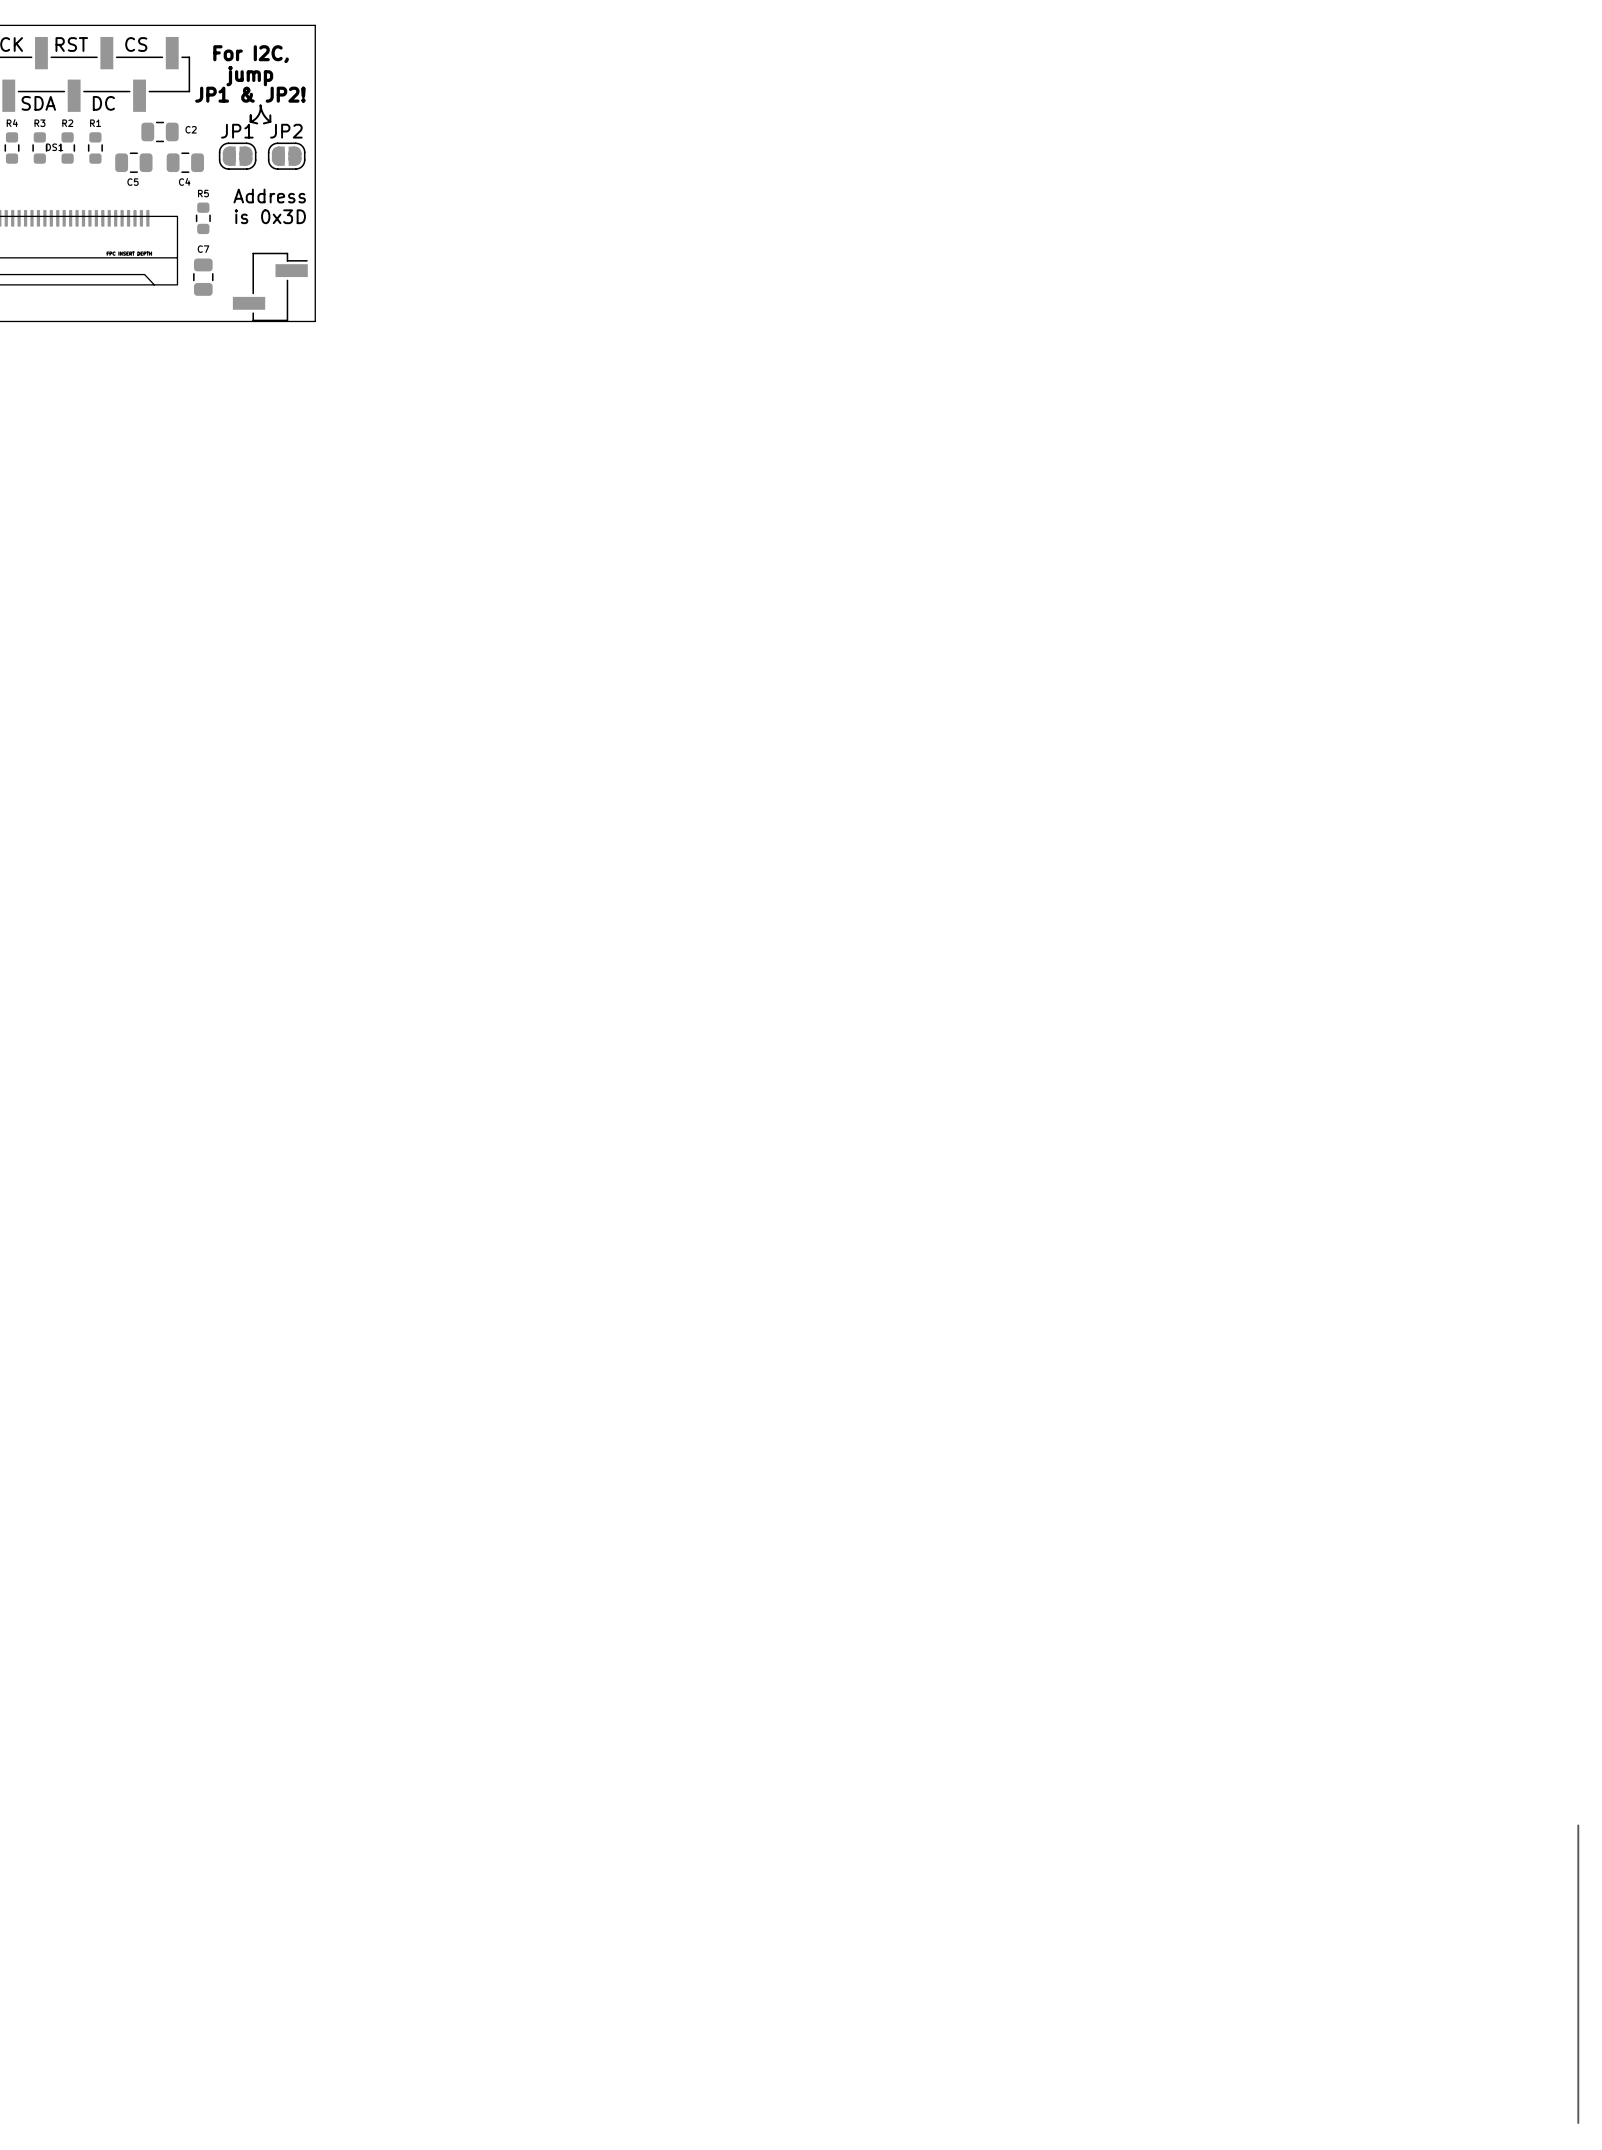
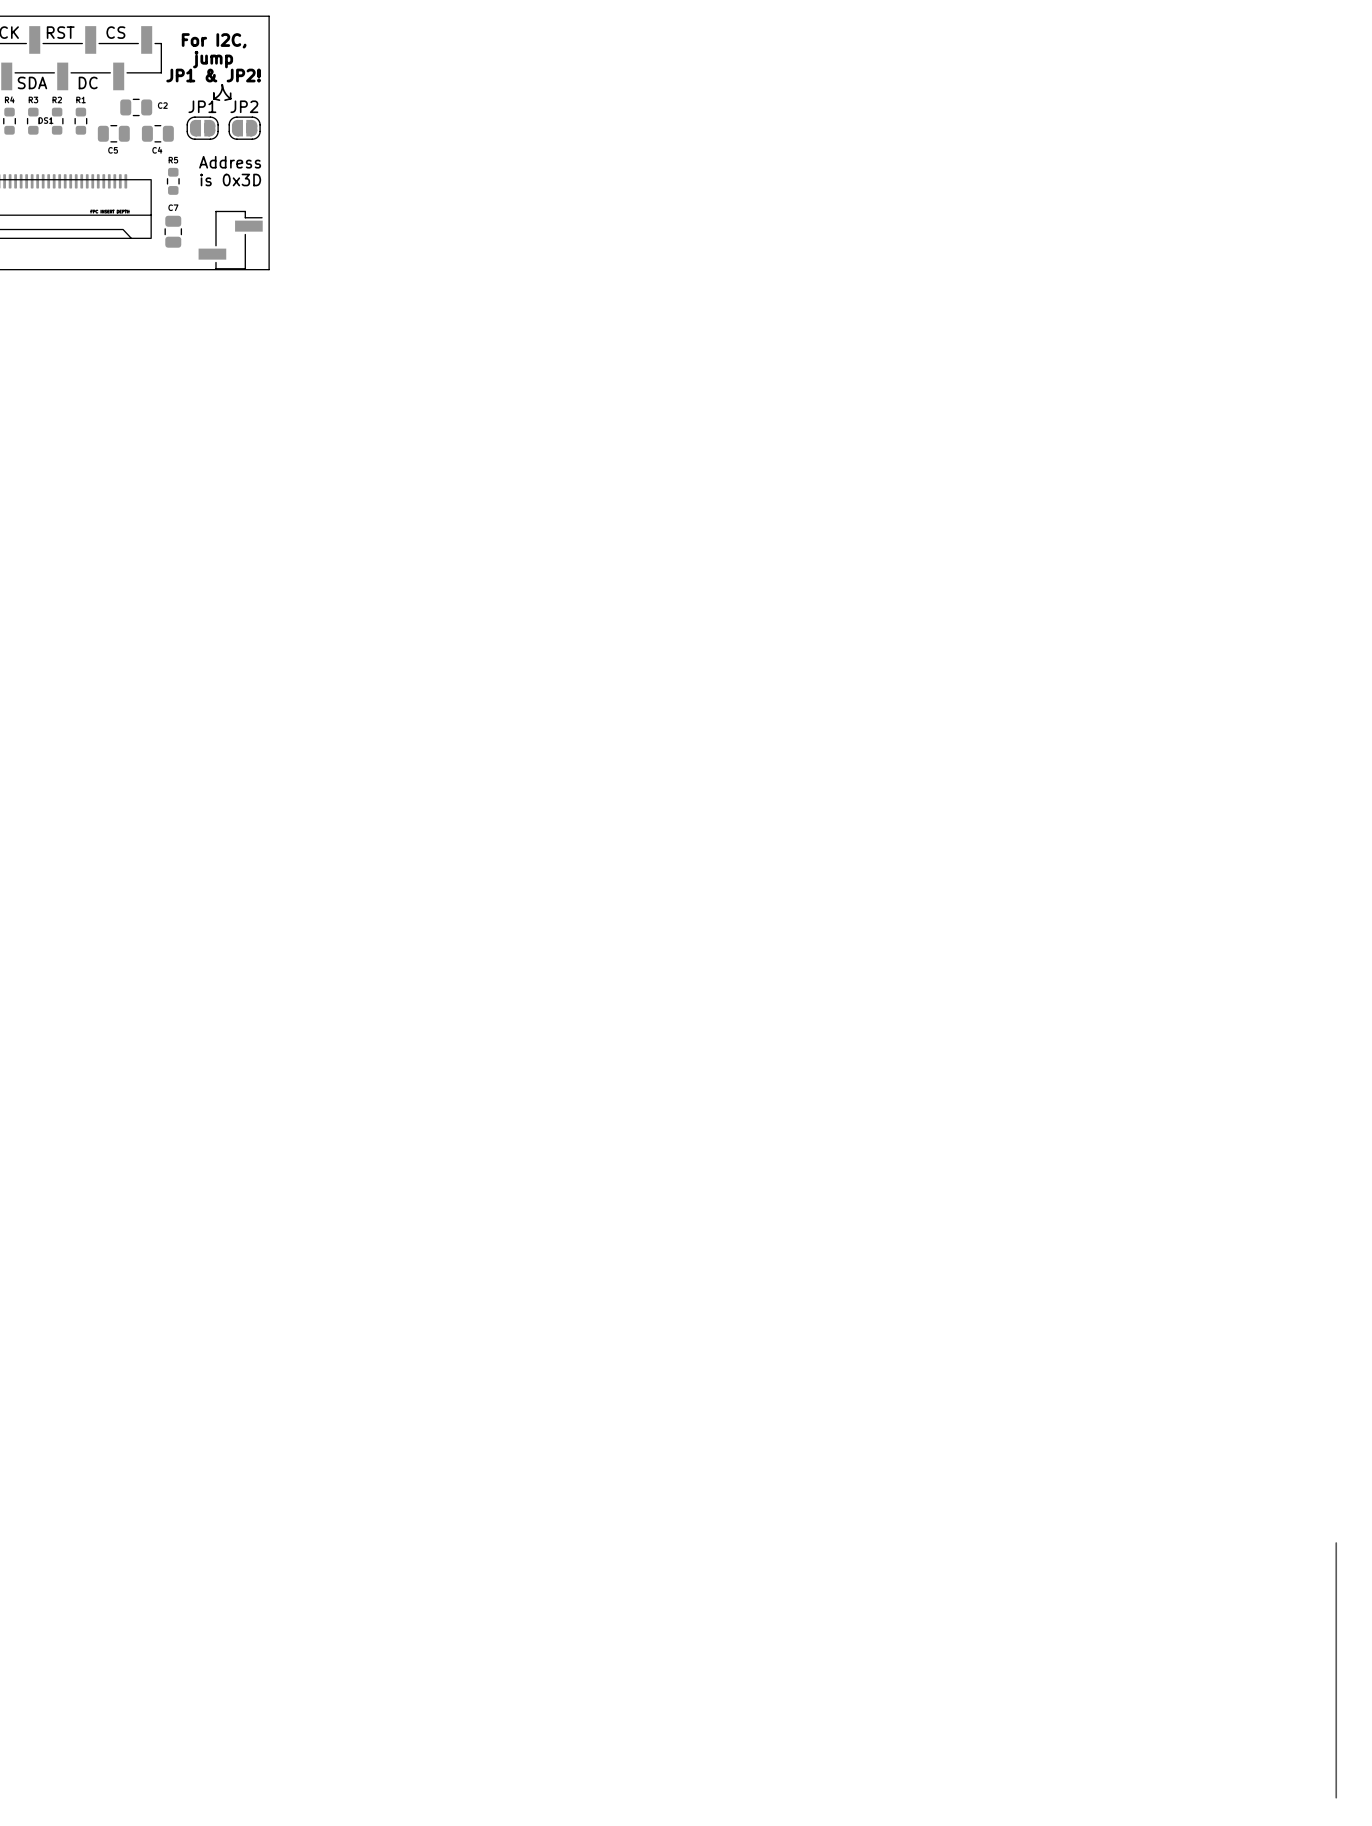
line: (1578, 1825) (1578, 2122) -> (1336, 1543) (1336, 1797)

